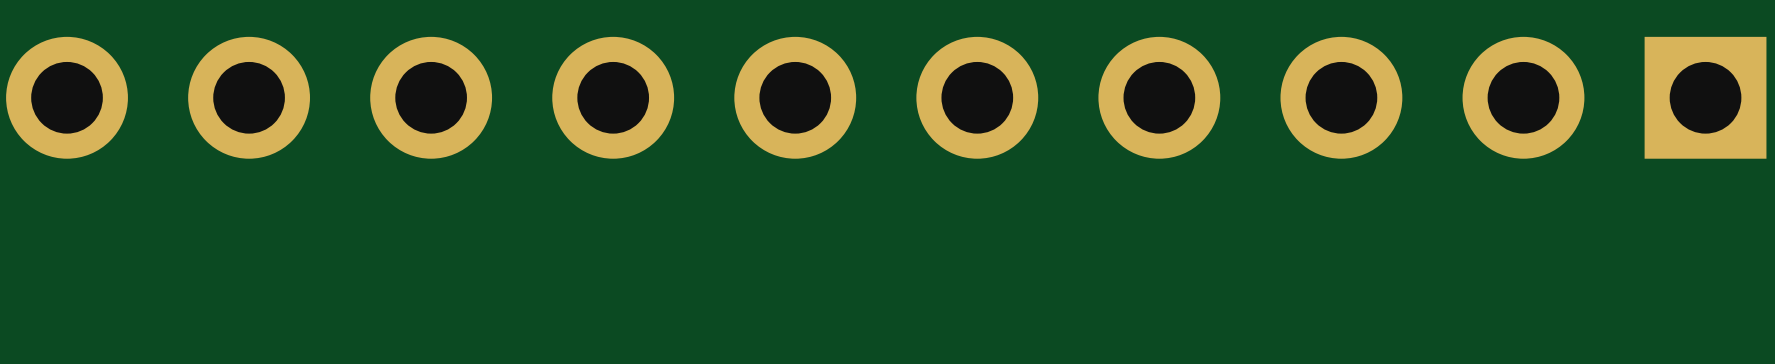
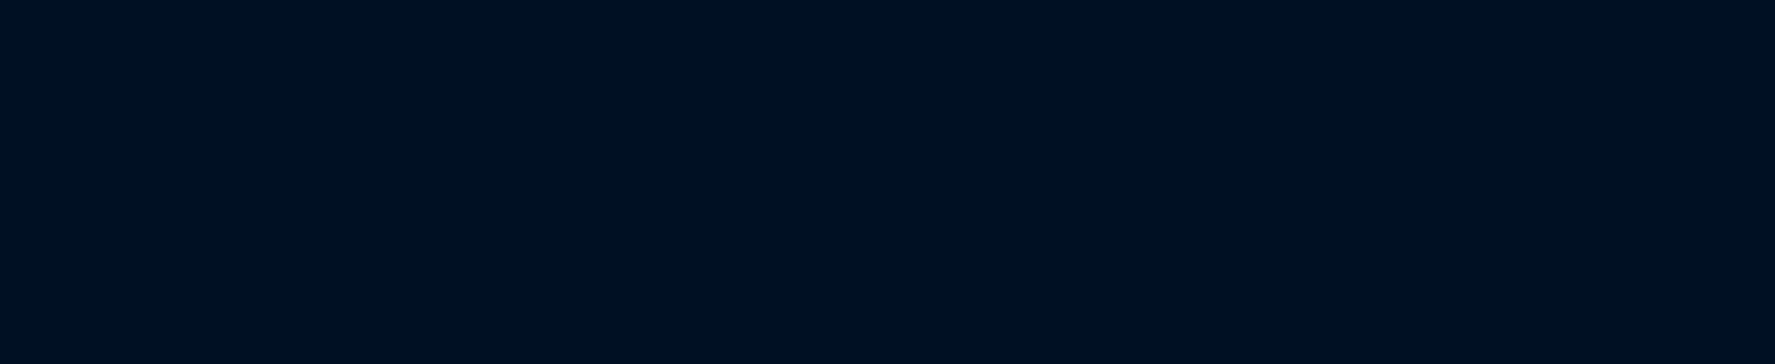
part: (886, 97) -> none

